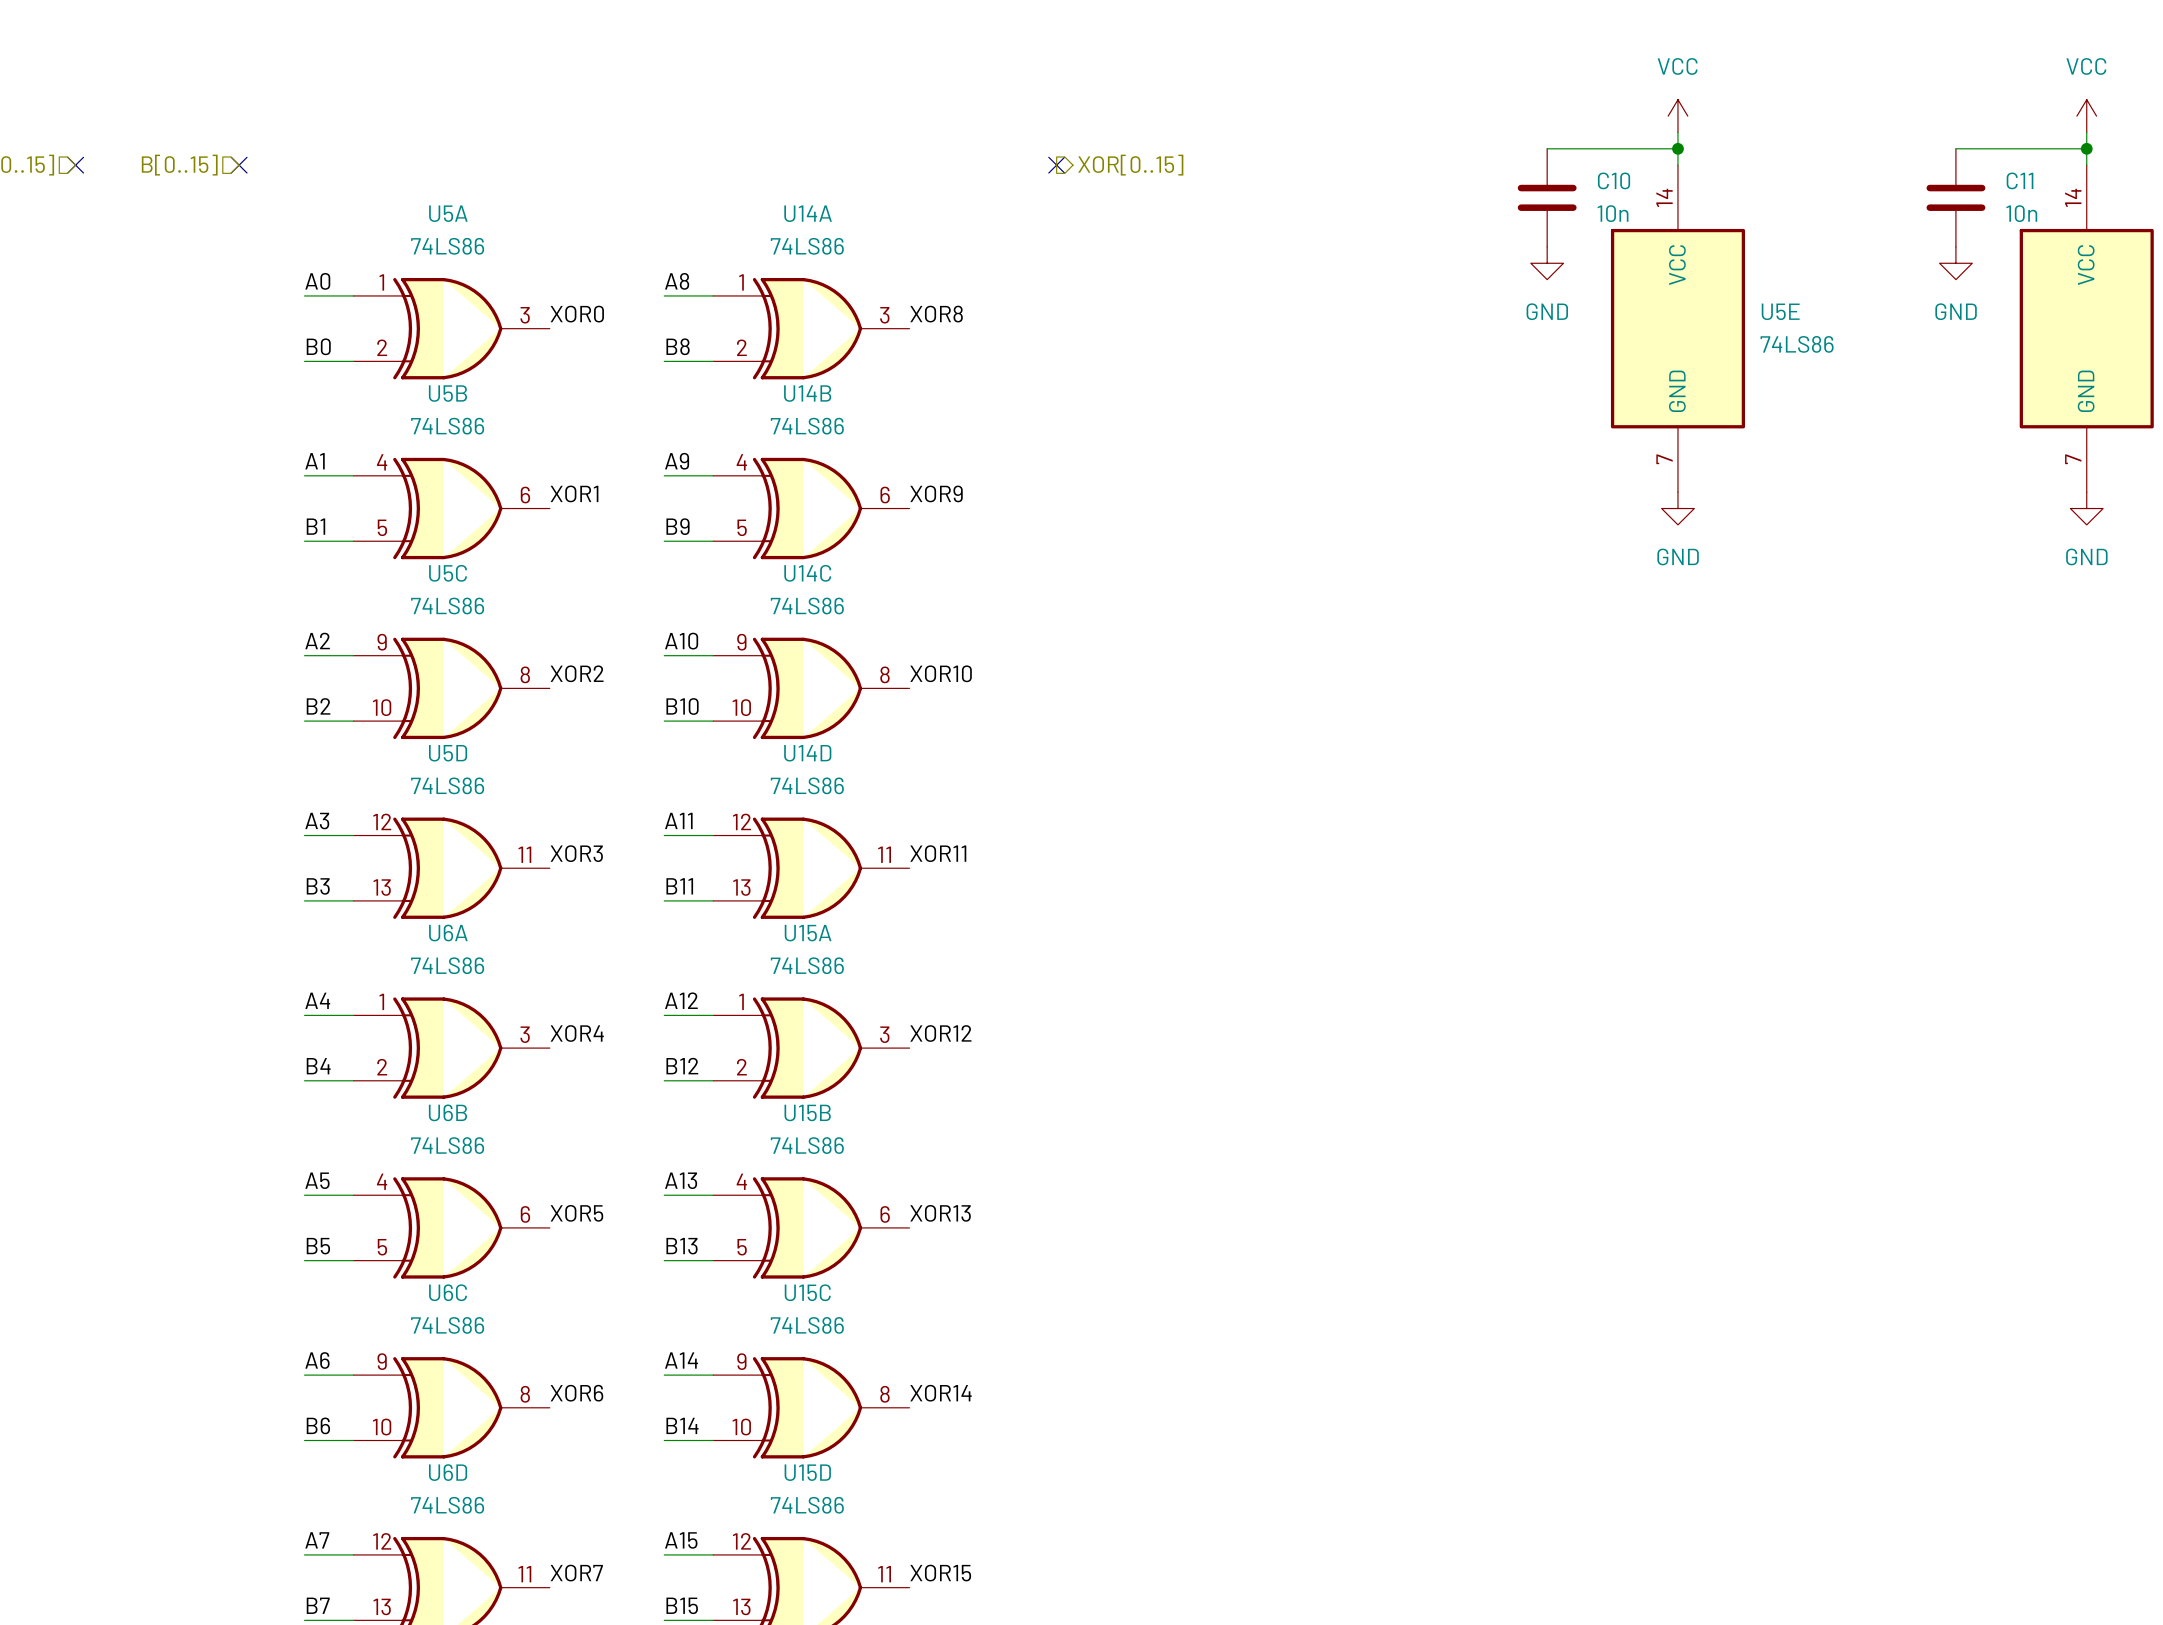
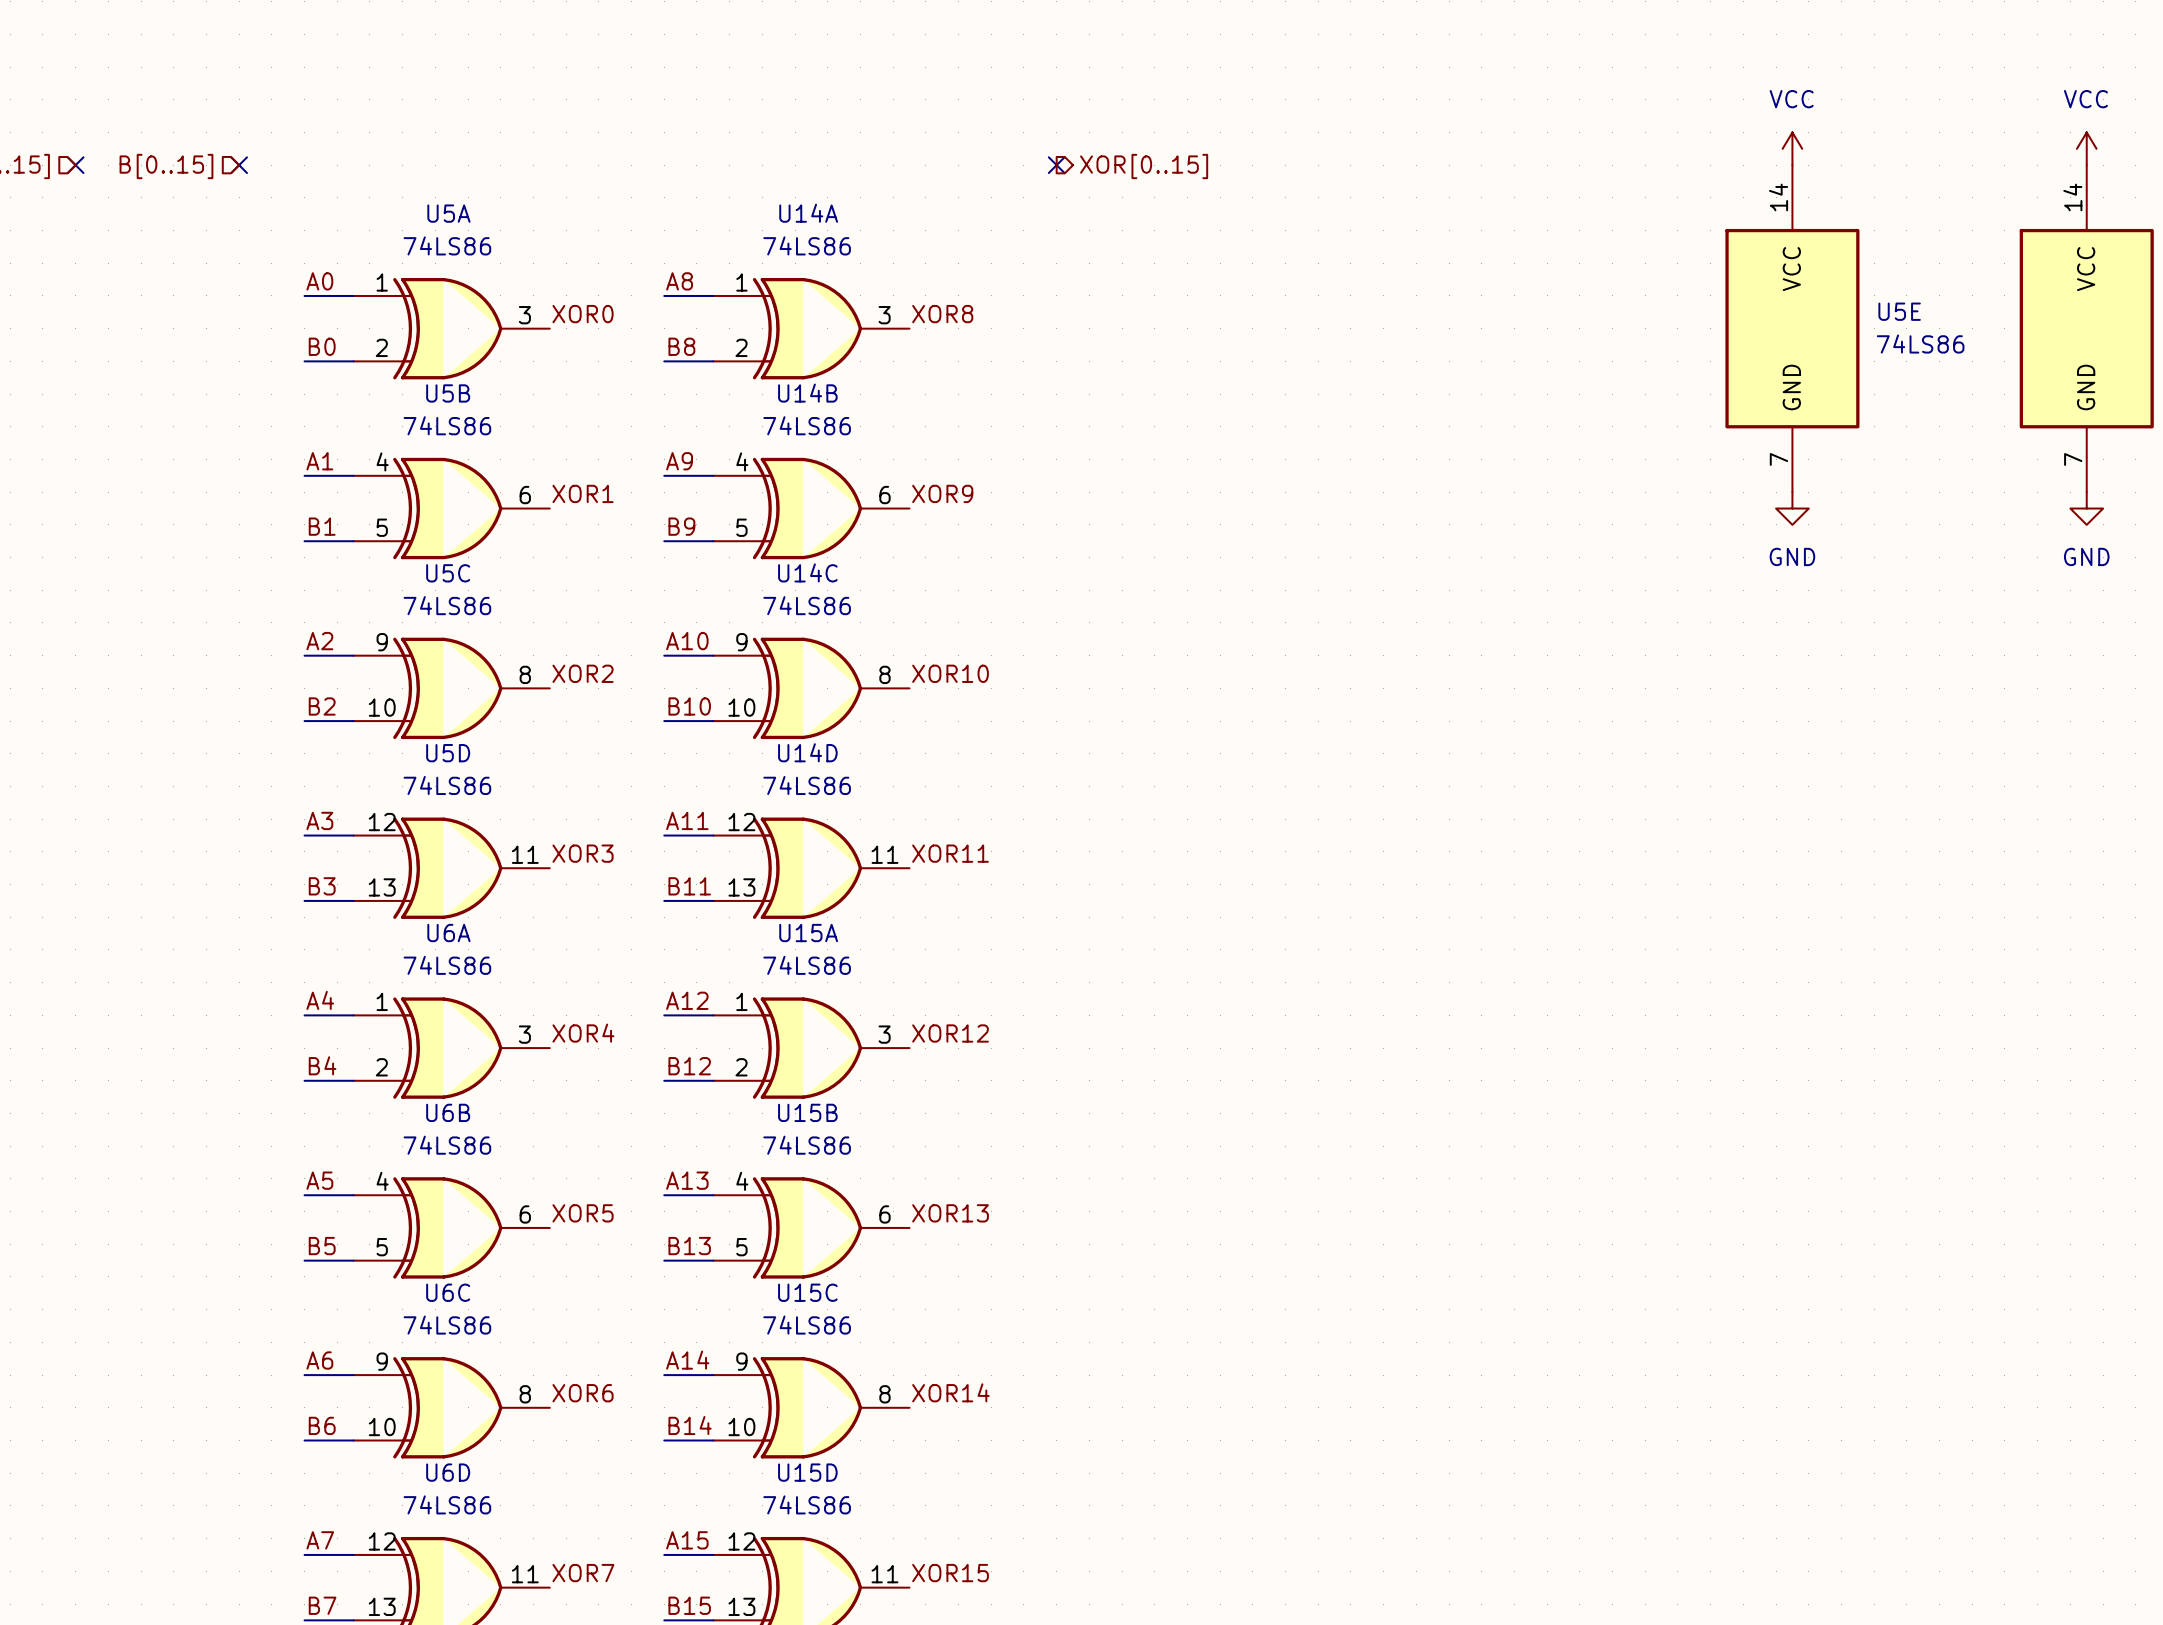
power symbol position: VCC (1677, 116) -> VCC (1792, 148)
power symbol position: VCC (2086, 116) -> VCC (2086, 148)
wire: (1677, 132) (1677, 165) -> none
wire: (1547, 148) (1677, 148) -> none
junction: (1677, 148) -> none
wire: (1955, 148) (2086, 148) -> none
junction: (2086, 148) -> none
C10: 10n (1547, 197) -> none
C11: 10n (1955, 197) -> none
power symbol: GND (1547, 263) -> none
power symbol: GND (1955, 263) -> none
U5E position: (1677, 328) -> (1792, 328)
power symbol position: GND (1677, 508) -> GND (1792, 508)

